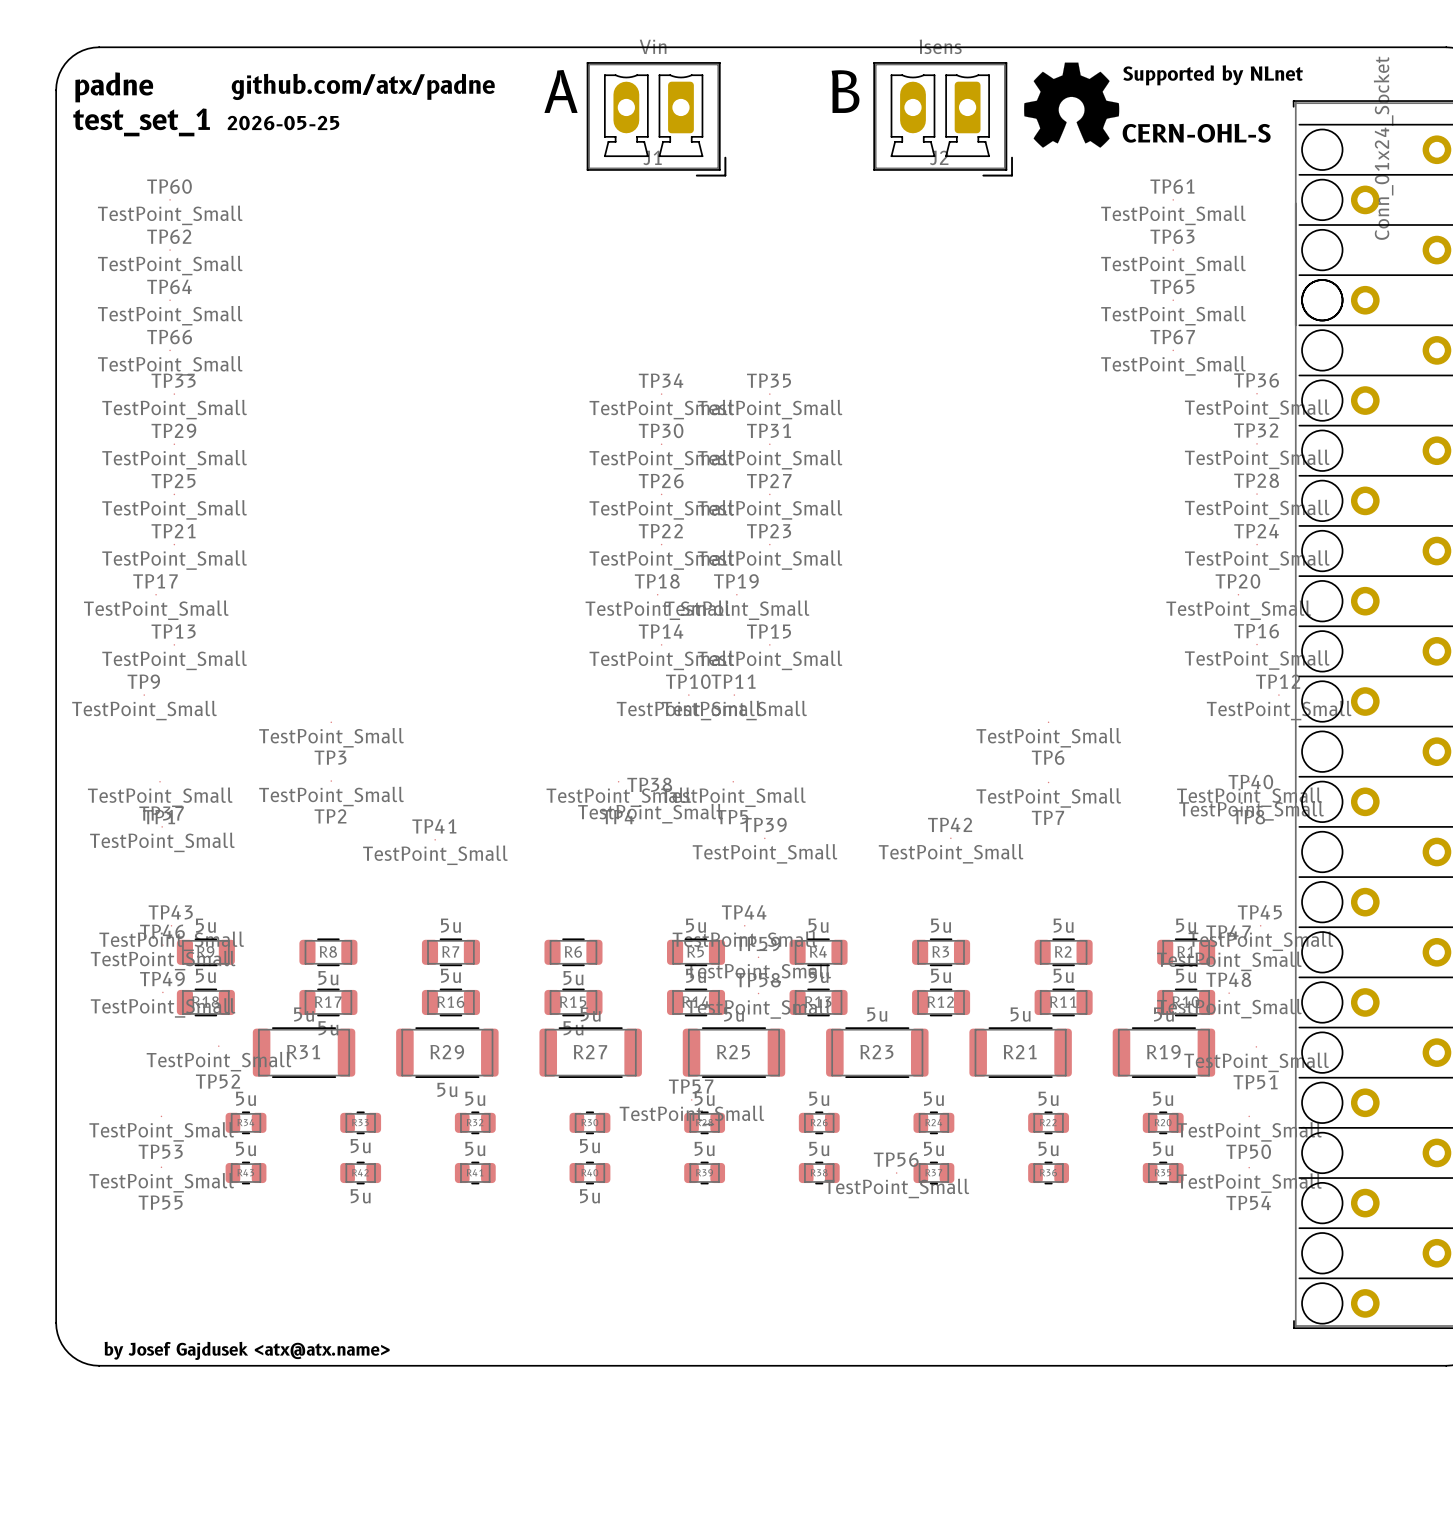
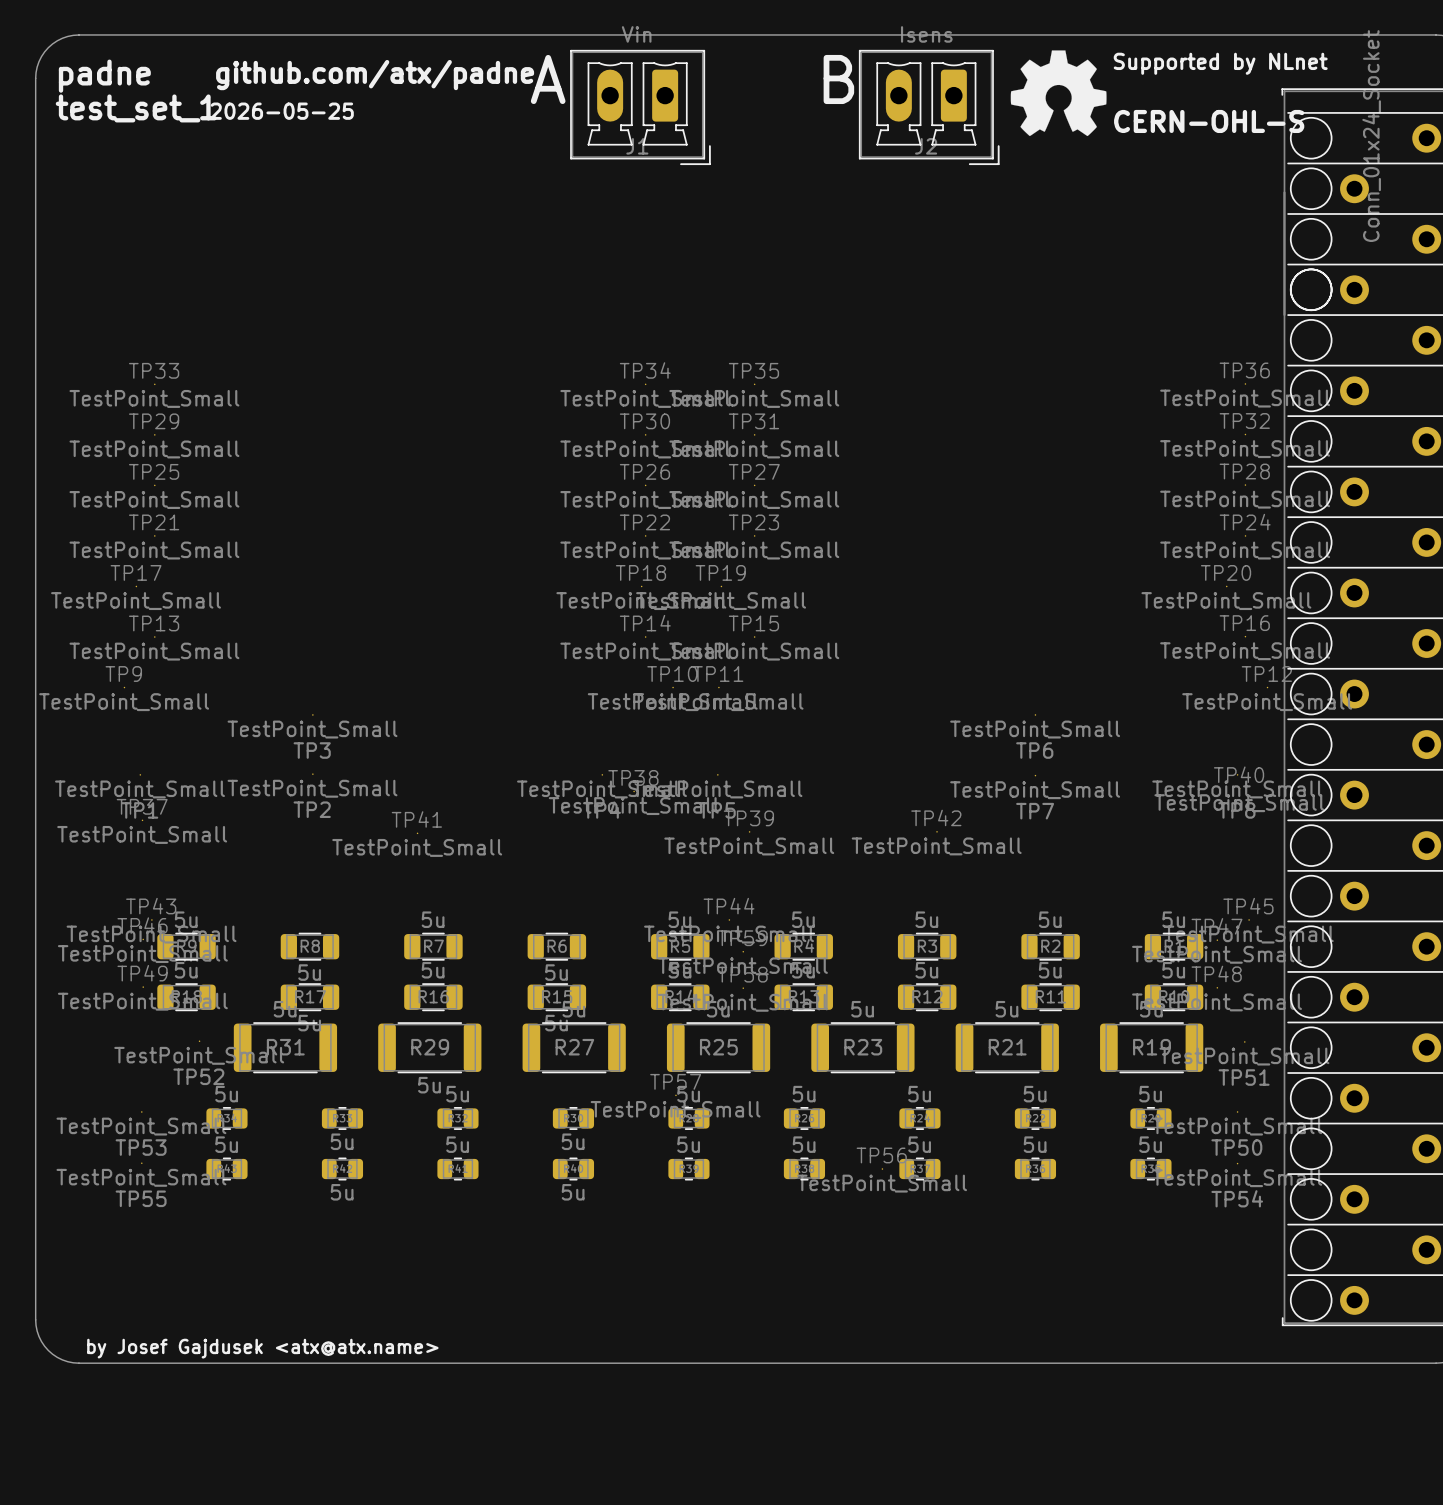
TP60: TestPoint_Small (170, 199) -> none
TP61: TestPoint_Small (1173, 199) -> none
TP62: TestPoint_Small (170, 250) -> none
TP63: TestPoint_Small (1173, 250) -> none
TP64: TestPoint_Small (170, 300) -> none
TP65: TestPoint_Small (1173, 300) -> none
TP66: TestPoint_Small (170, 350) -> none
TP67: TestPoint_Small (1173, 350) -> none

